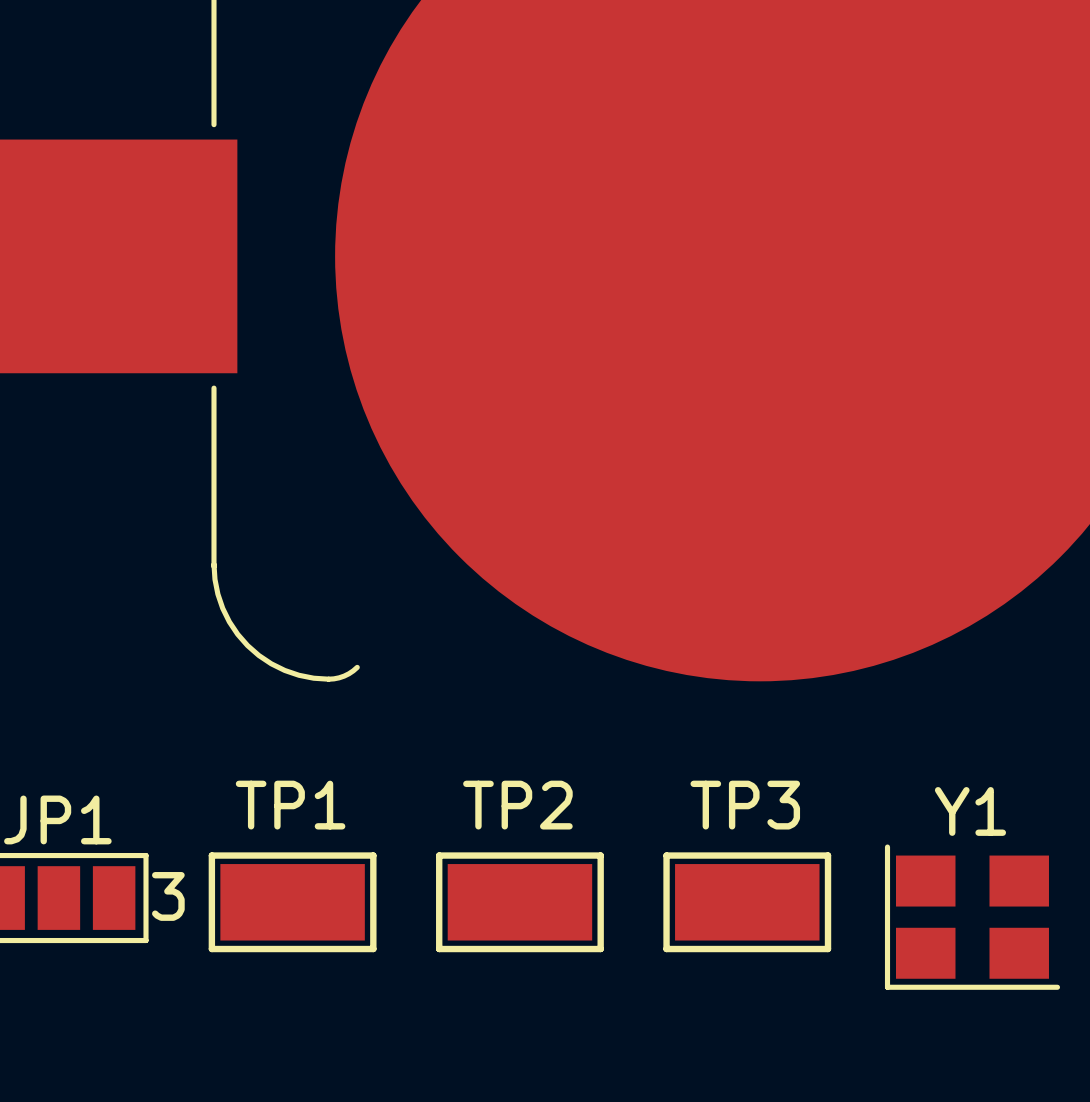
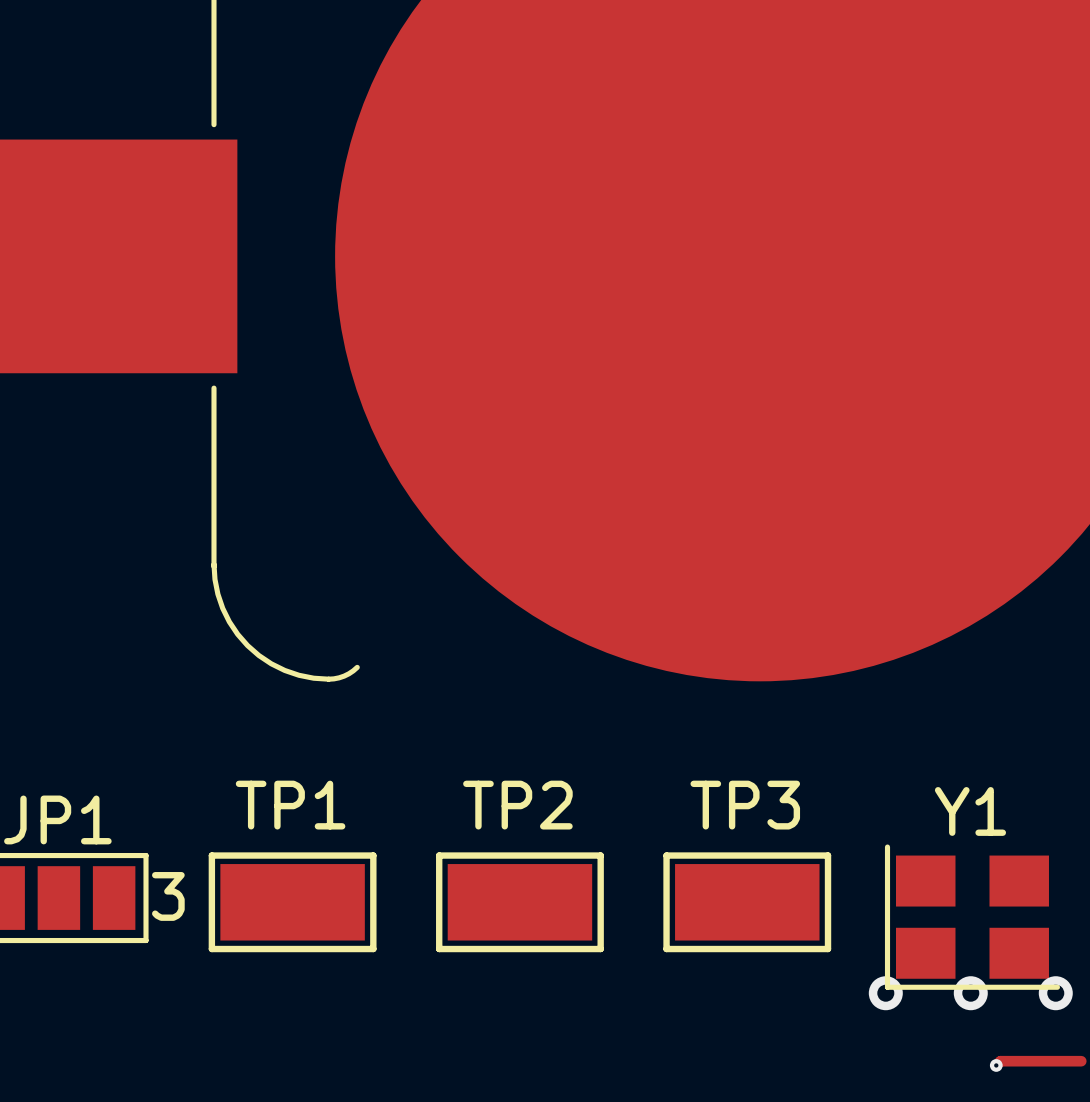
via: none -> (885, 993)
via: none -> (970, 993)
via: none -> (1055, 993)
track: none -> (1081, 1061) (1000, 1061) (996, 1065)
via: none -> (996, 1065)

